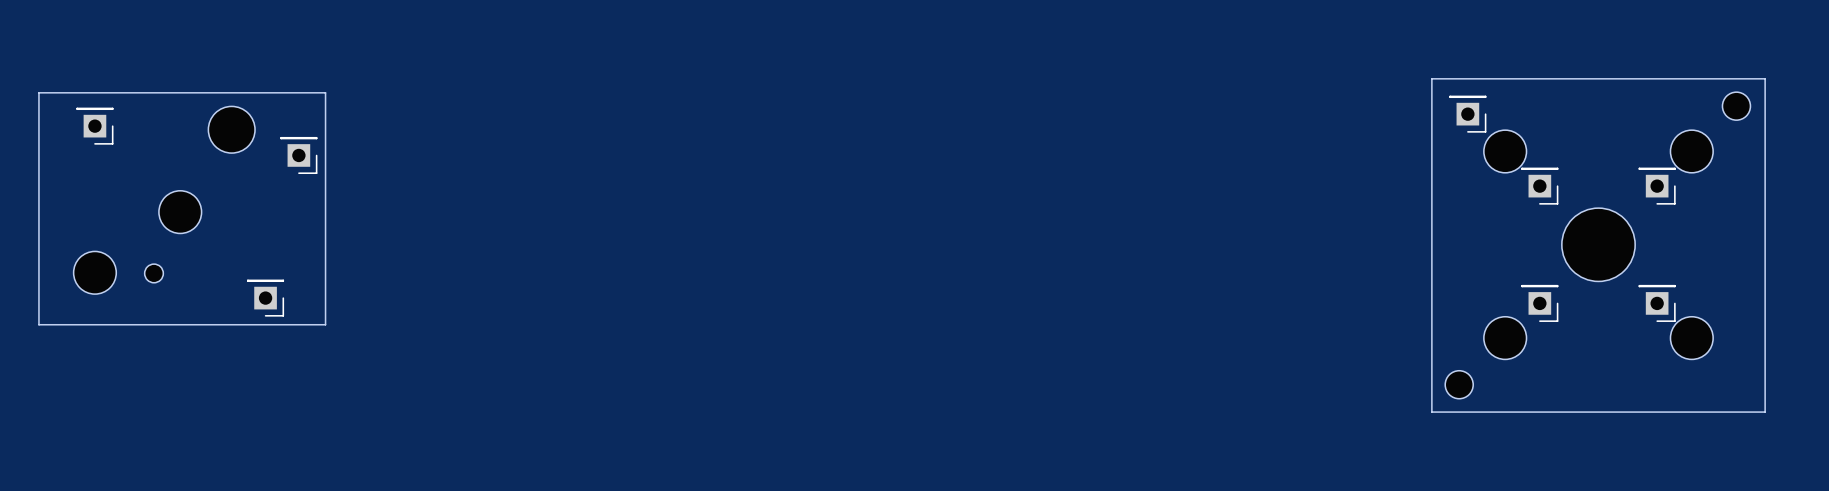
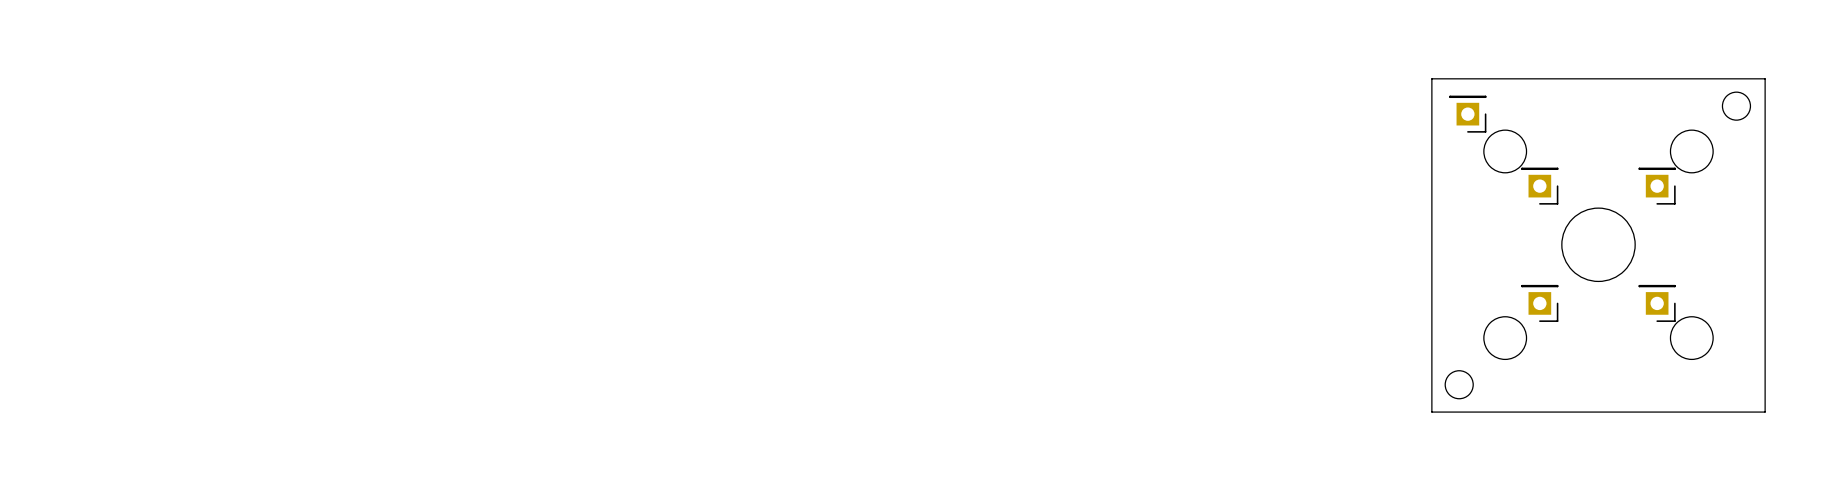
board edge: (325, 92) (325, 324) (38, 324) (38, 92) (325, 92) -> none
part: (94, 126) -> none
part: (231, 129) -> none
part: (298, 155) -> none
part: (180, 212) -> none
part: (94, 272) -> none
part: (153, 273) -> none
part: (265, 298) -> none

